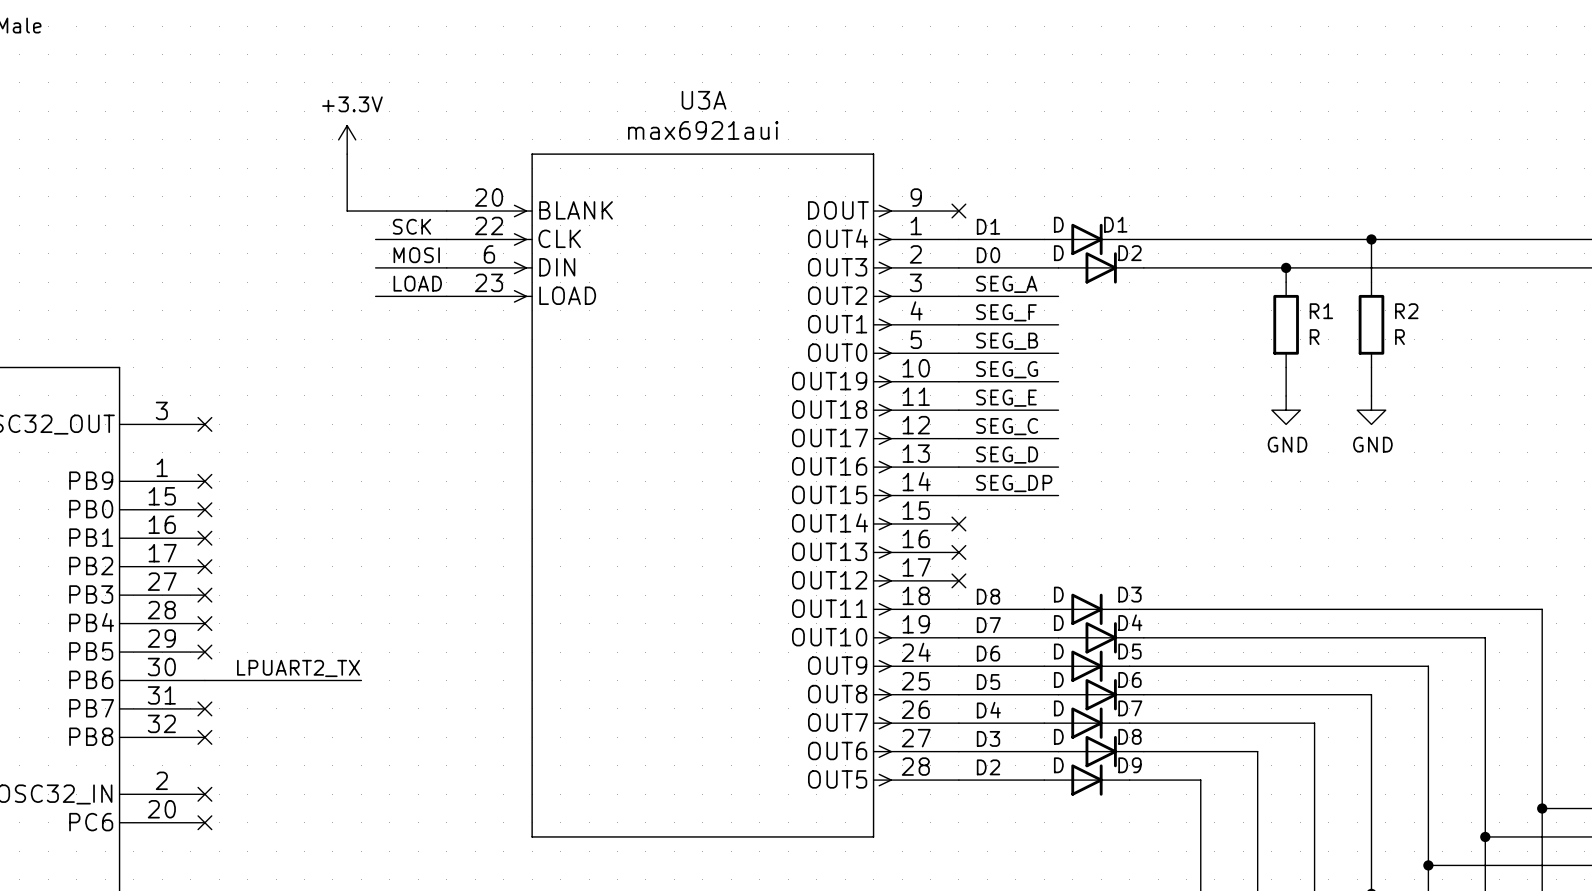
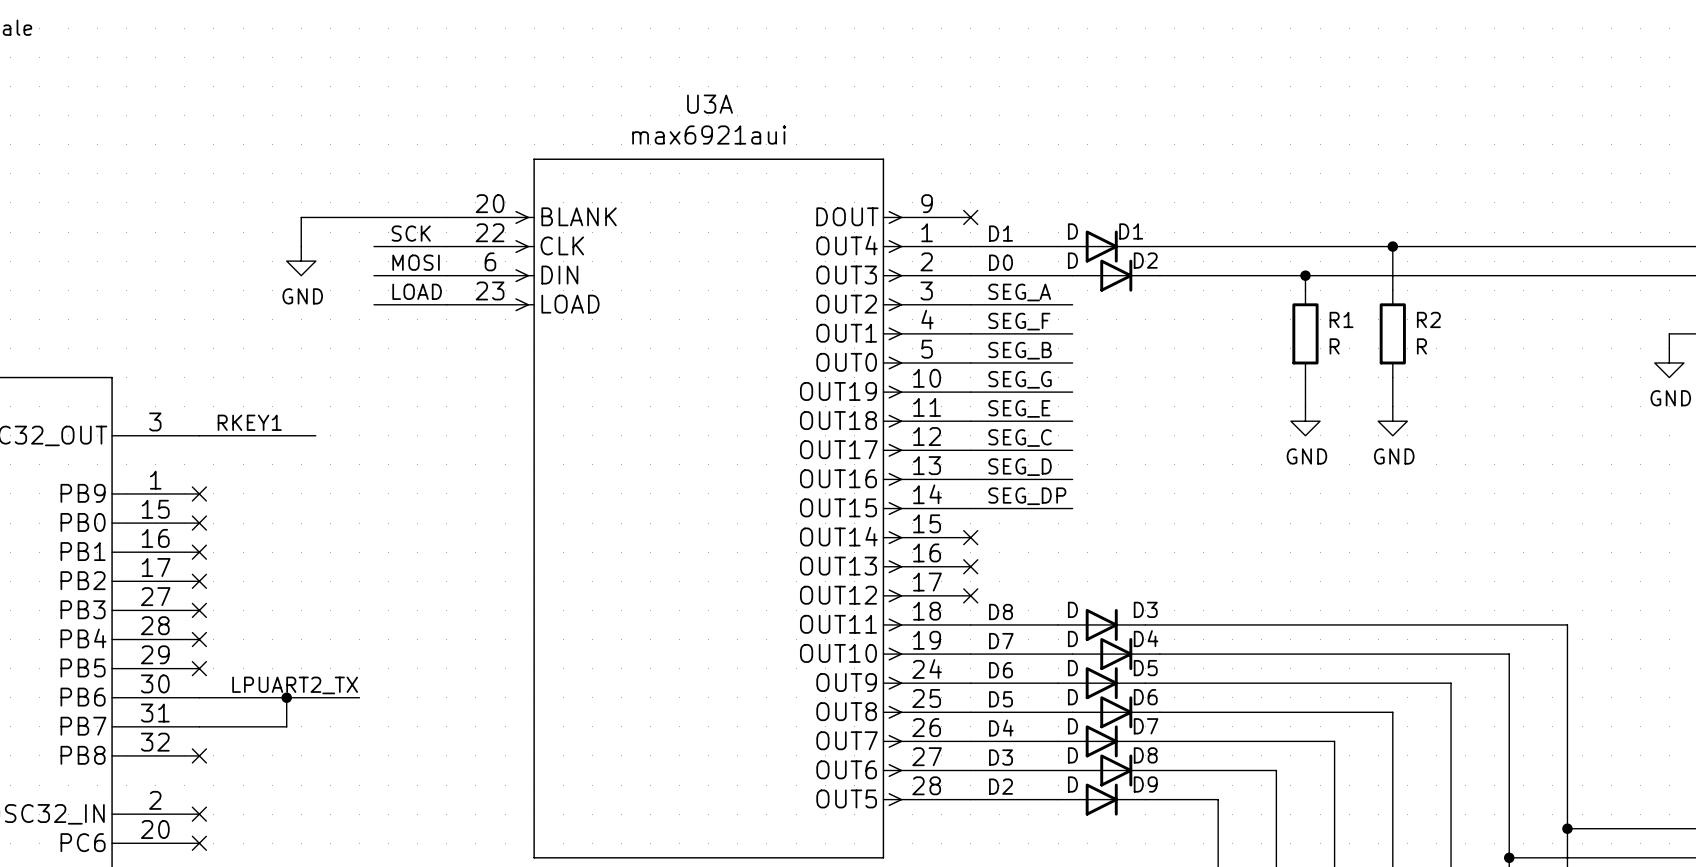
power symbol: +3.3V (347, 139) -> none
wire: (347, 154) (347, 211) -> (301, 246) (301, 217) (344, 217)
power symbol: none -> GND (301, 261)
label: none -> RKEY1 (249, 422)
wire: none -> (199, 435) (315, 435)
no-connect mark: (204, 424) -> none
wire: none -> (286, 697) (286, 726) (199, 726)
junction: none -> (286, 697)
no-connect mark: (204, 708) -> none

